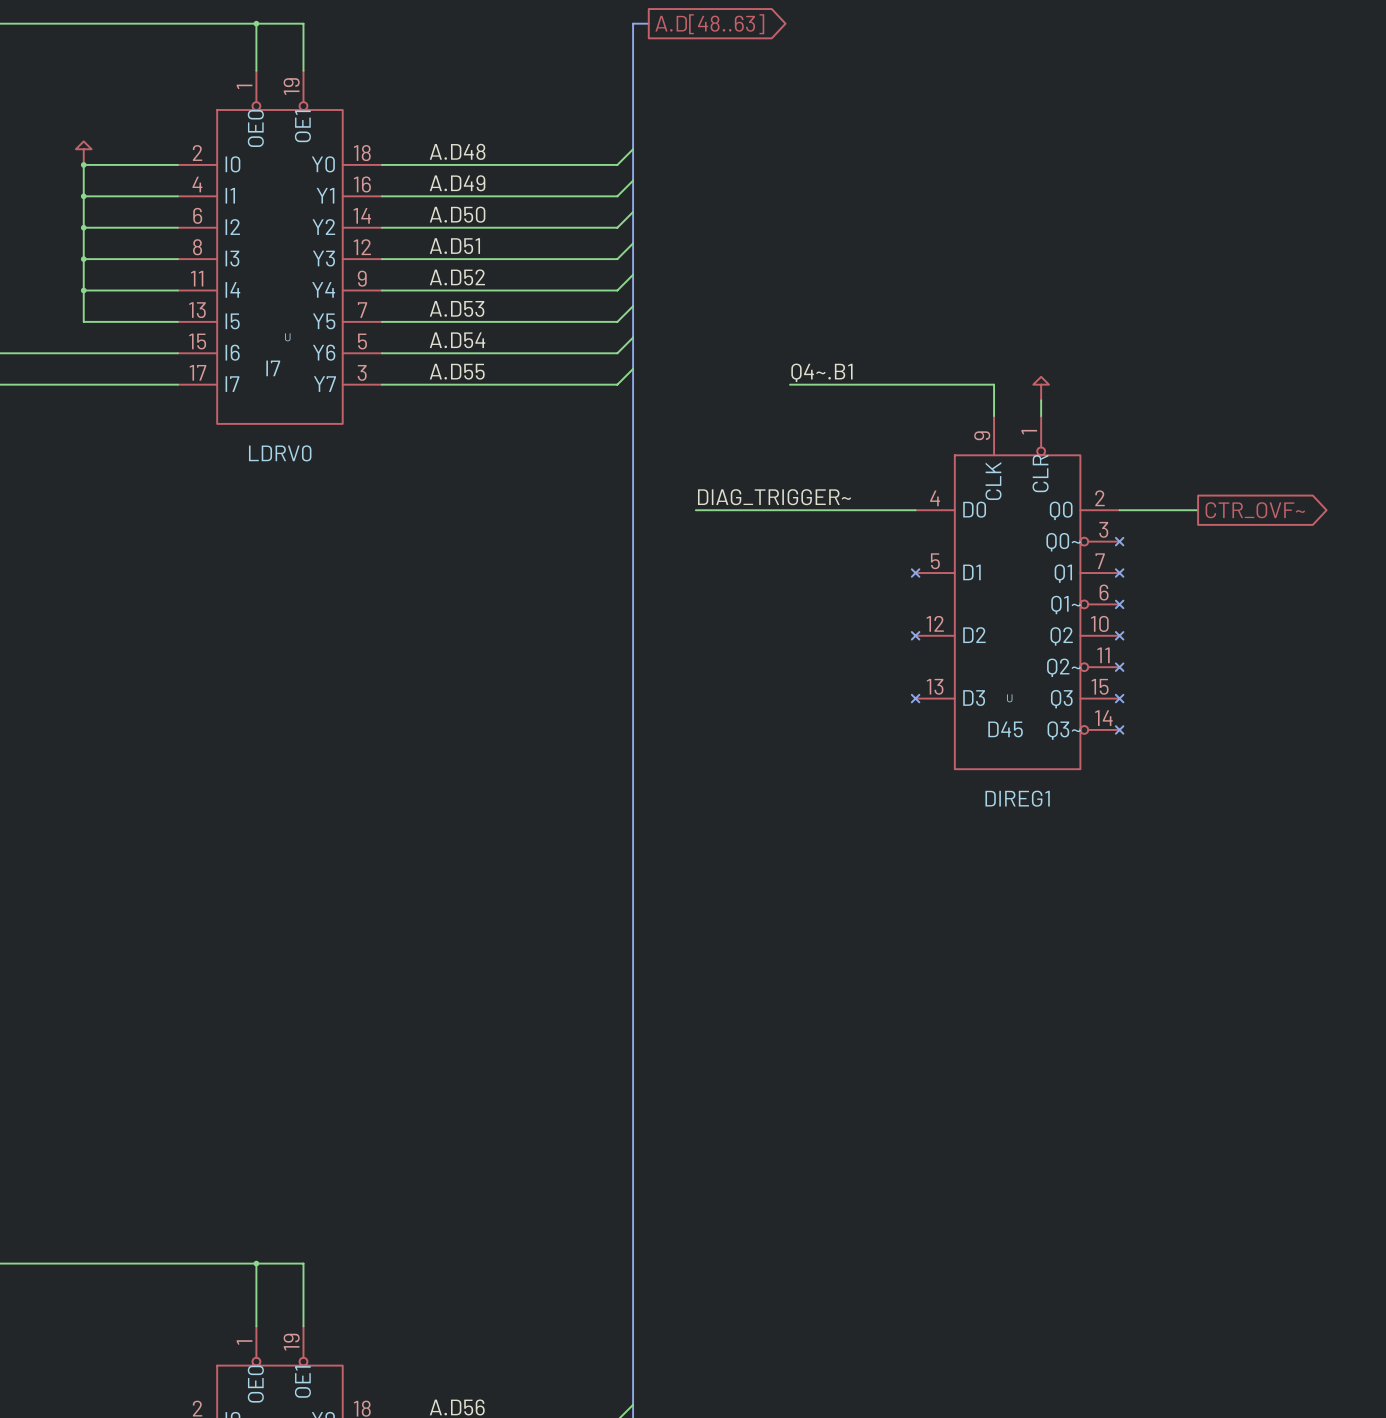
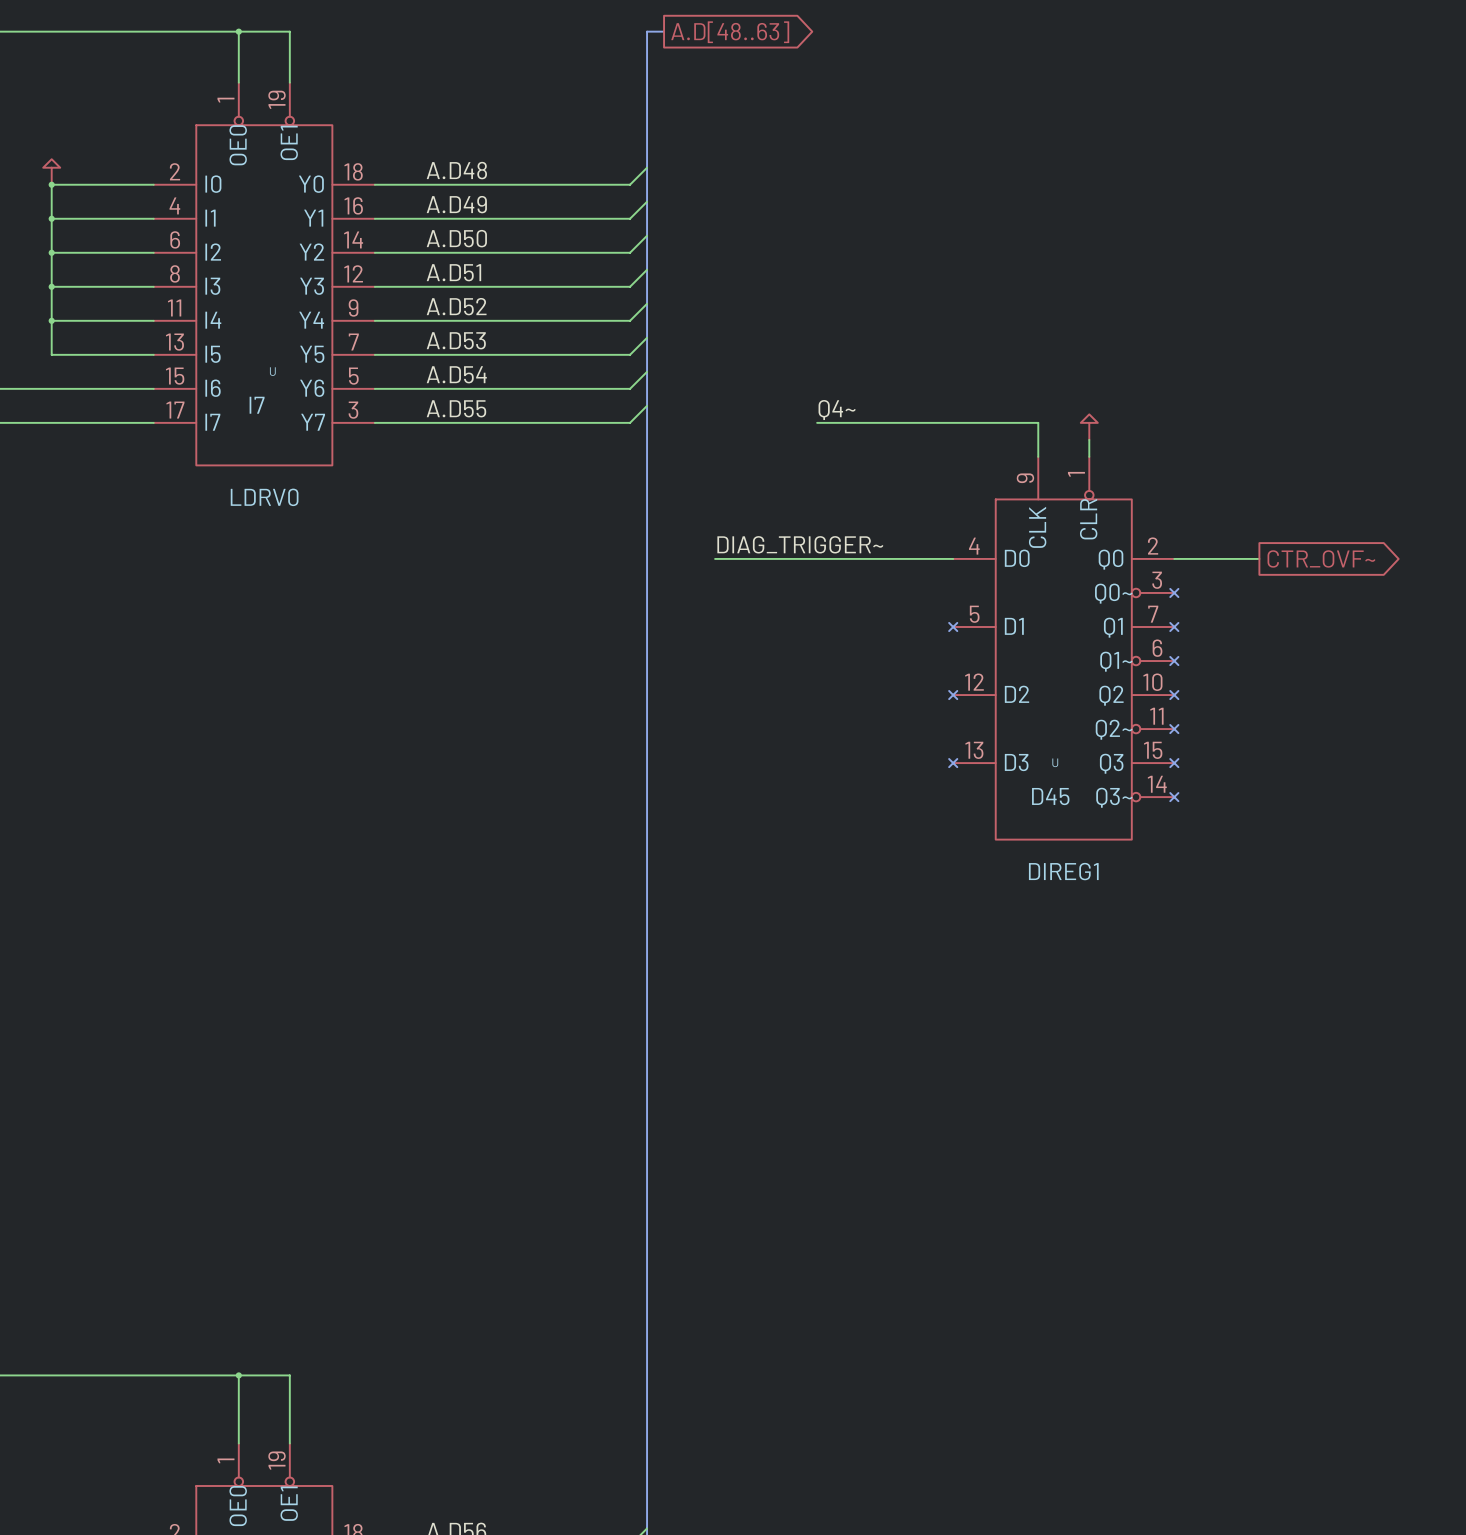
label: Q4~.B1 (821, 372) -> Q4~ (837, 410)

